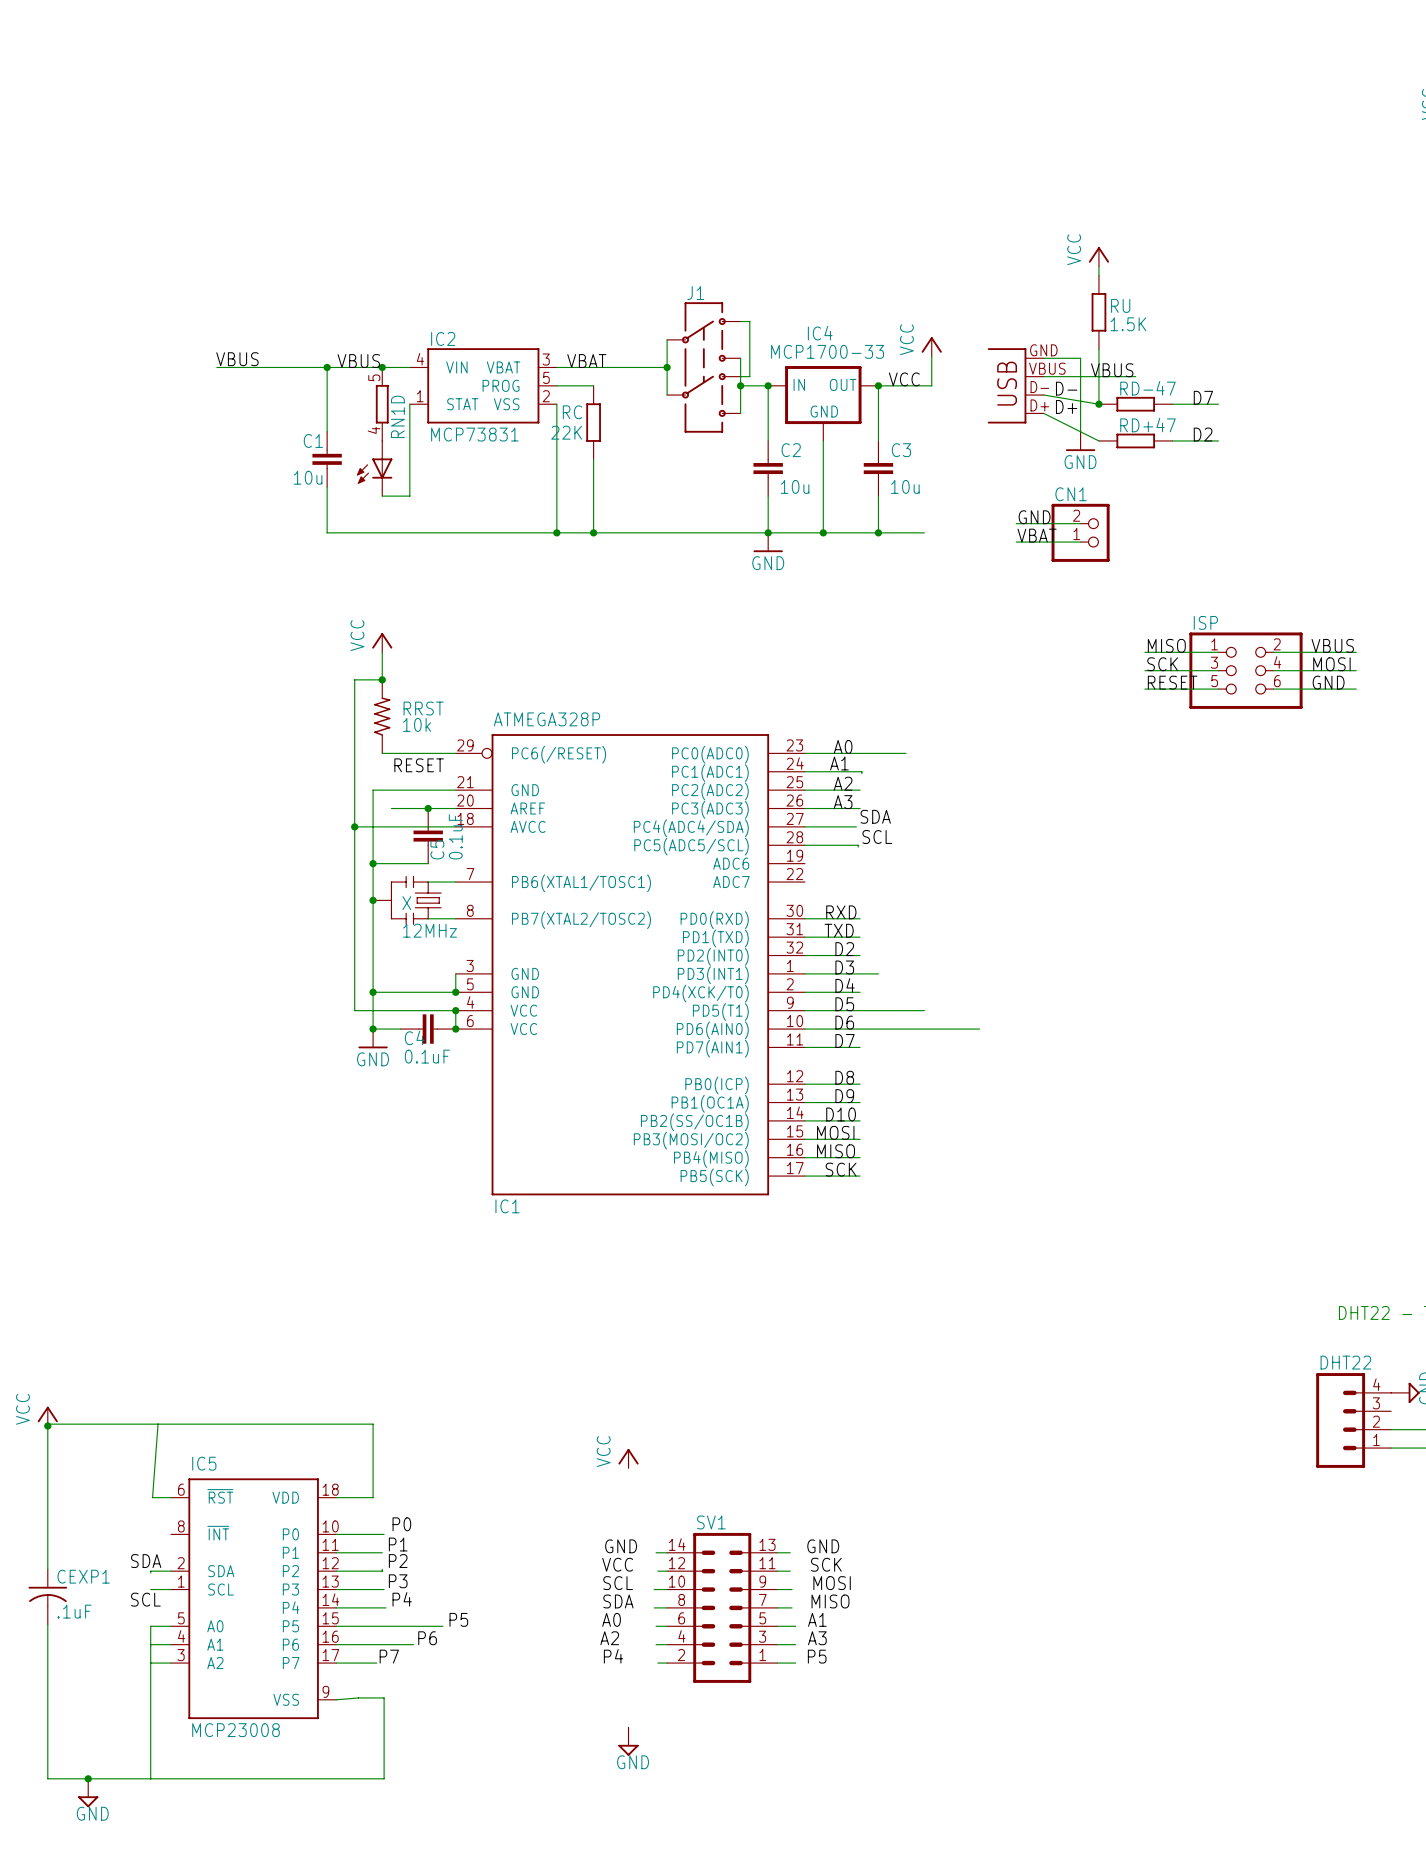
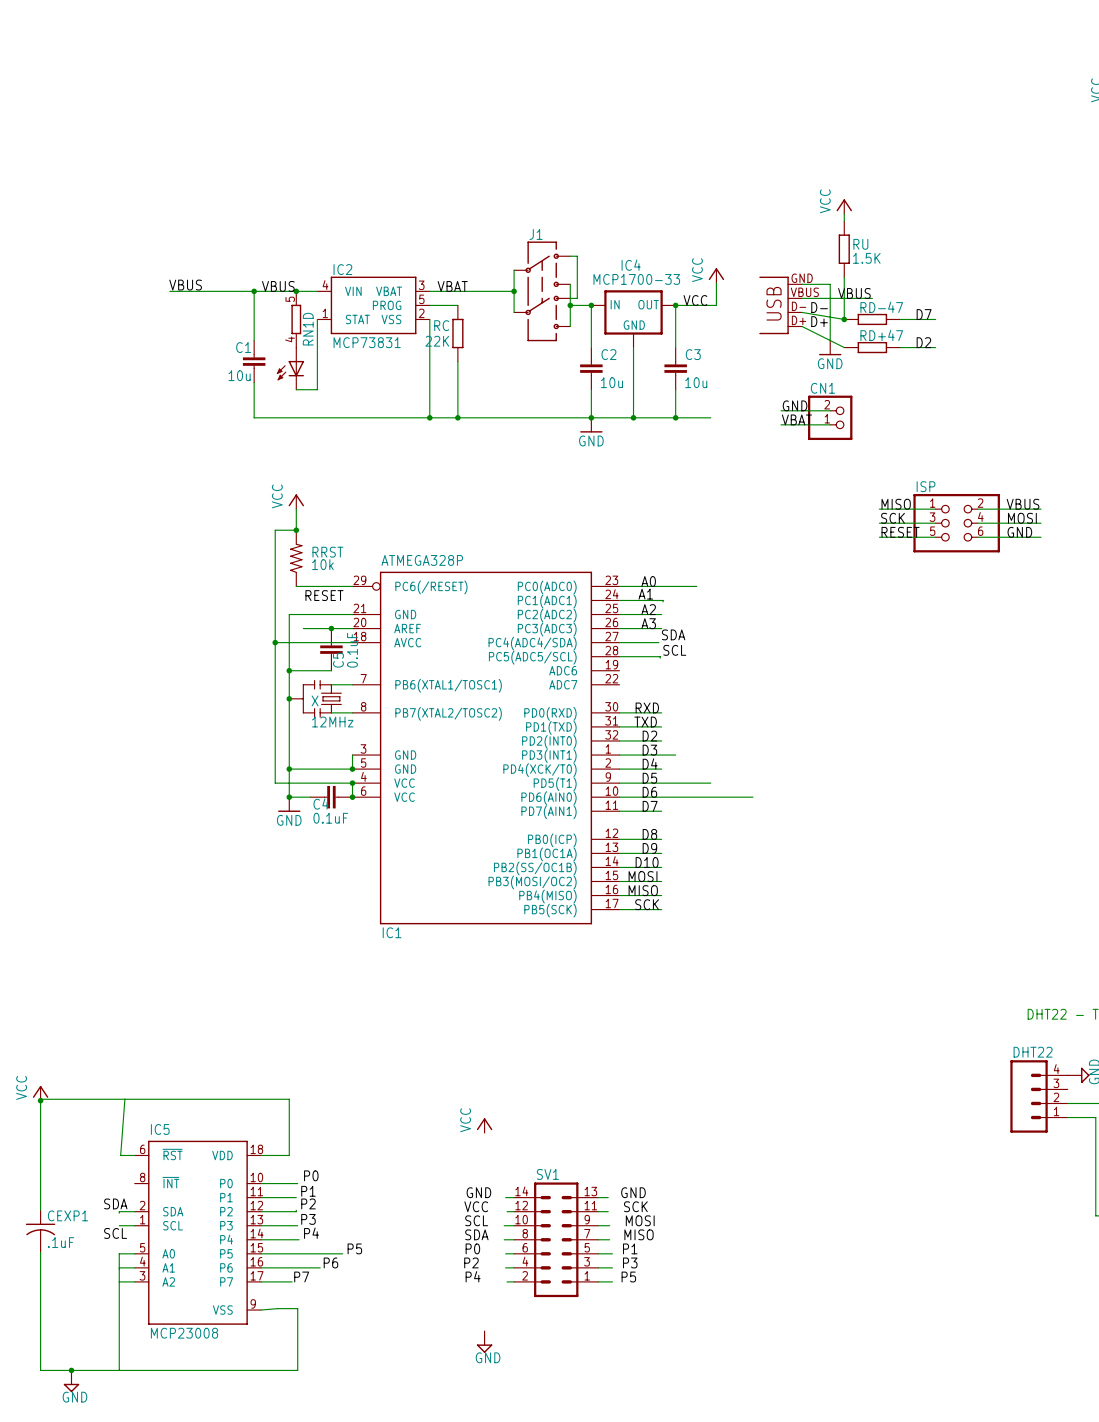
label: A0 (611, 1619) -> P0 (472, 1248)
label: A1 (817, 1619) -> P1 (630, 1248)
label: A2 (609, 1638) -> P2 (471, 1262)
label: A3 (817, 1638) -> P3 (630, 1262)

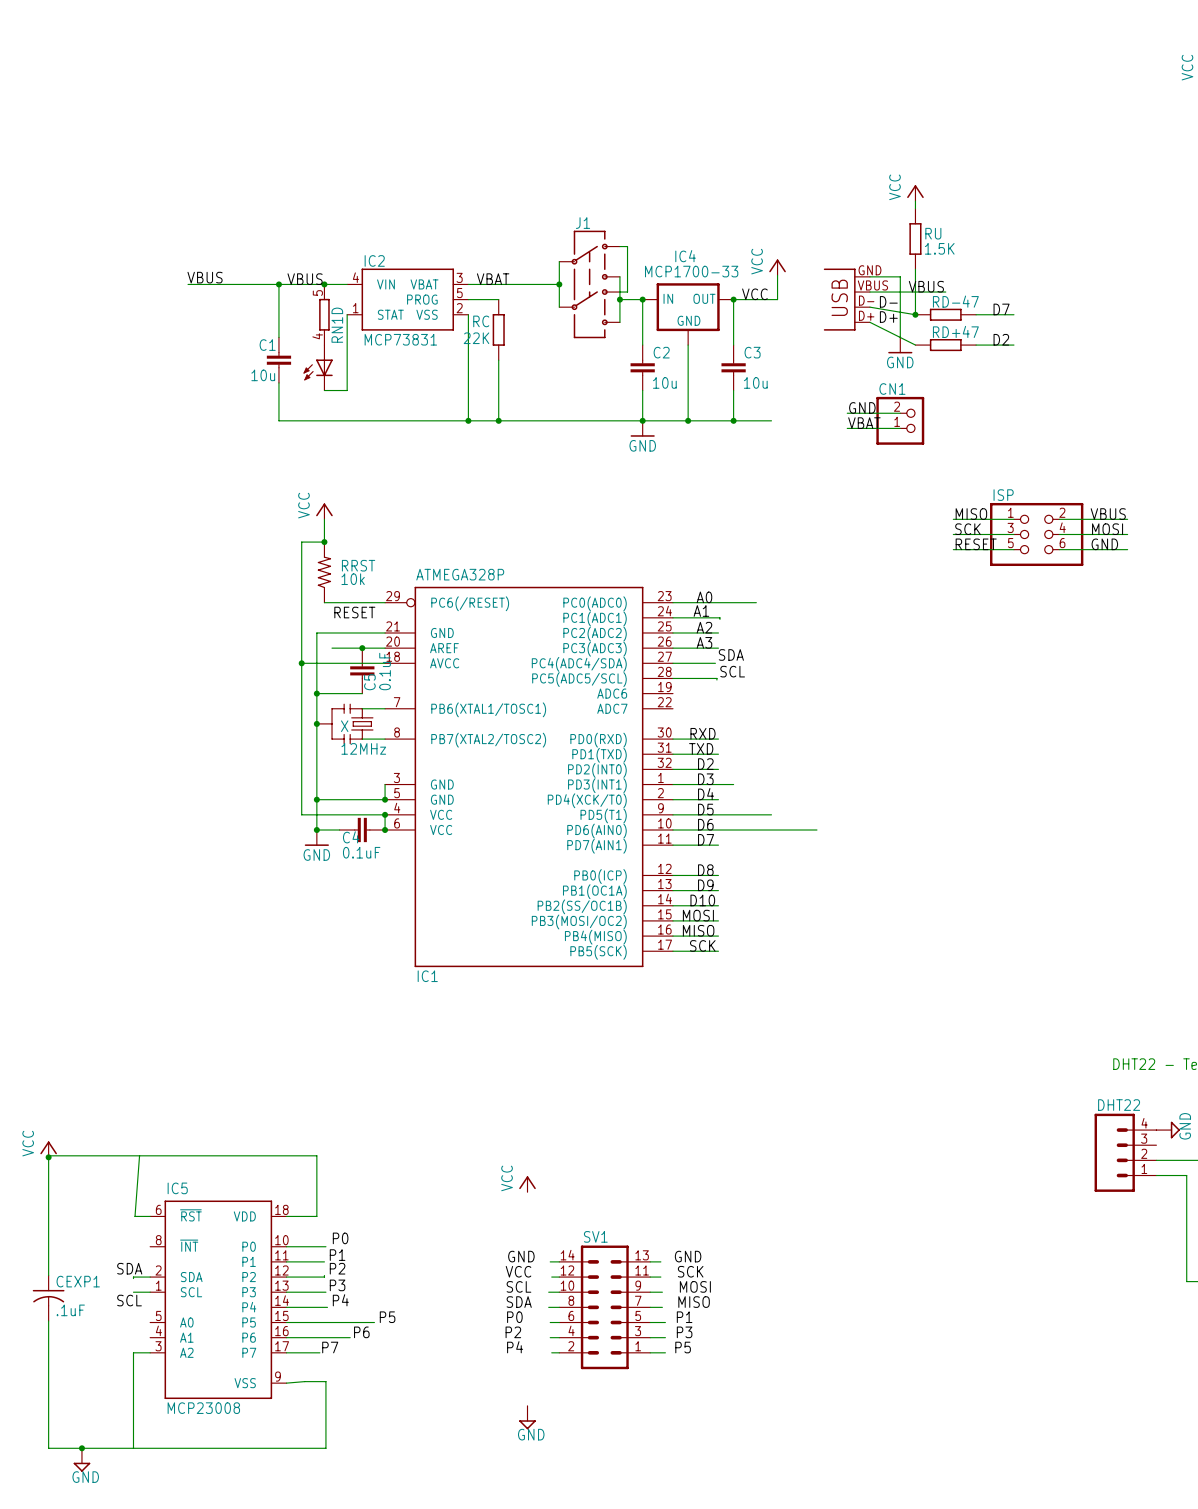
wire: (134, 1253) (119, 1253) (119, 1281) -> none
wire: (119, 1267) (134, 1267) -> none

